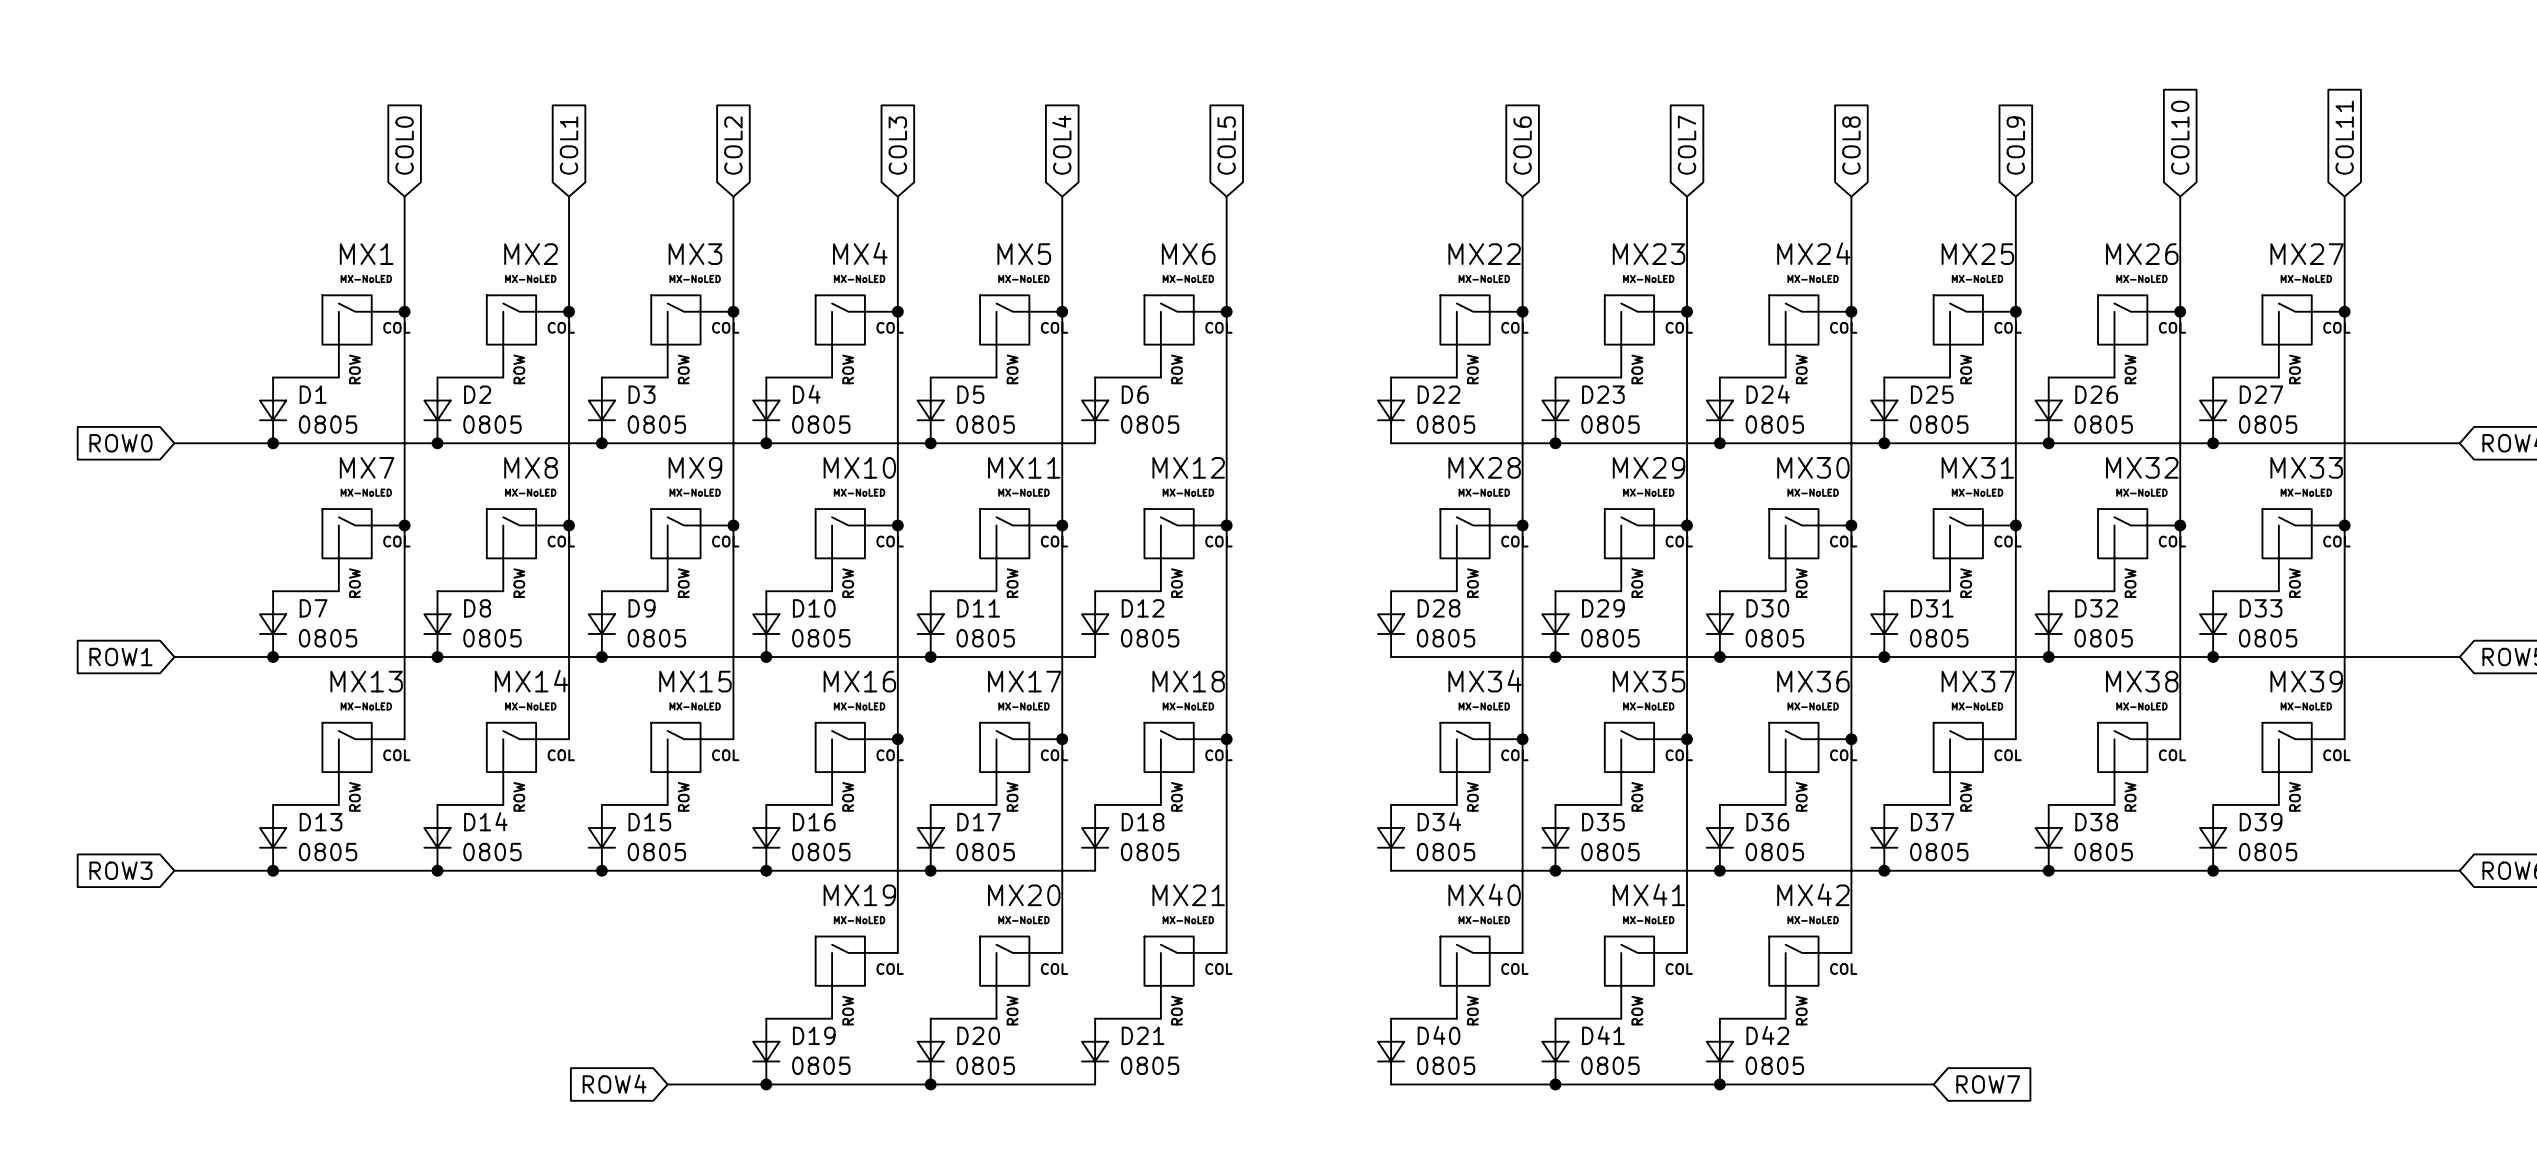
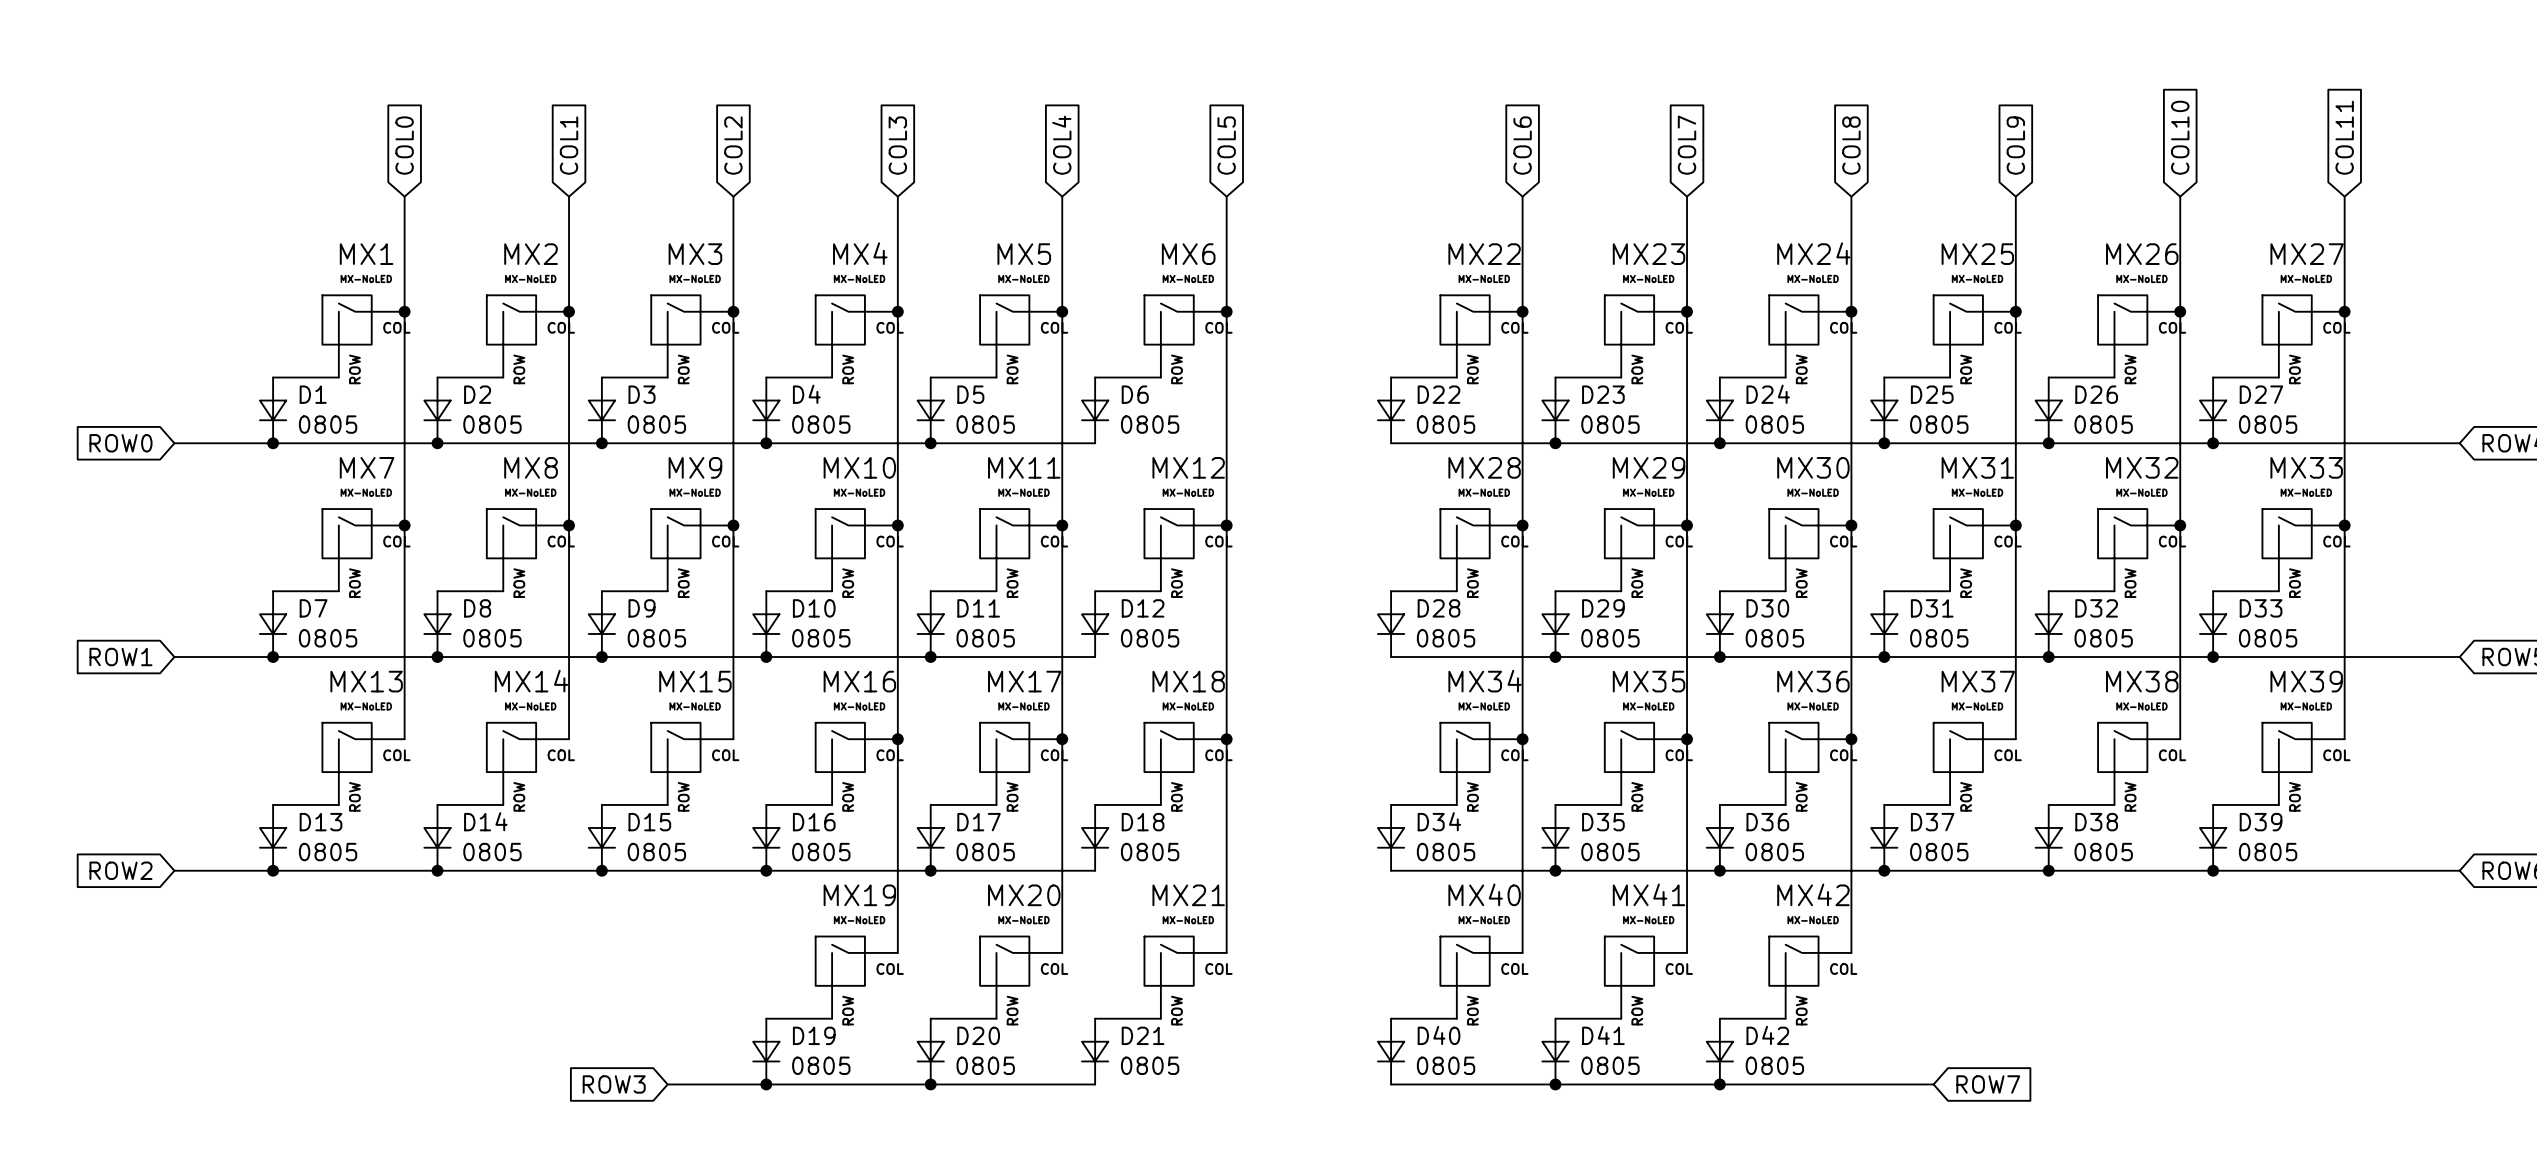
global label: ROW3 (120, 870) -> ROW2 (120, 870)
global label: ROW4 (614, 1084) -> ROW3 (614, 1084)

